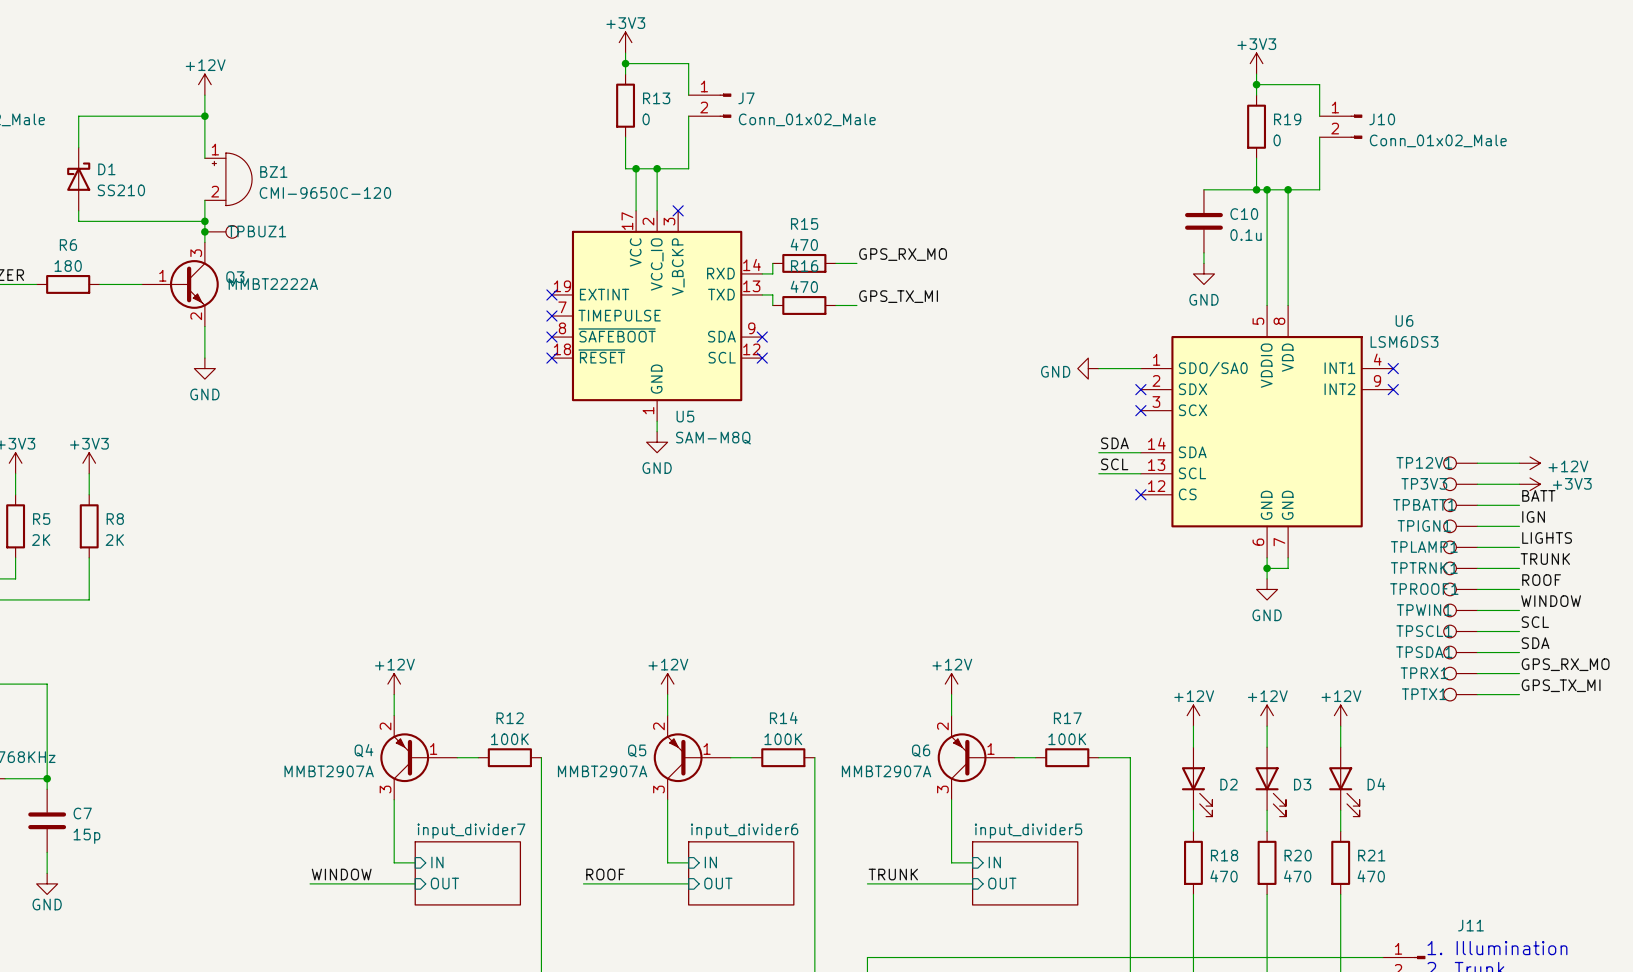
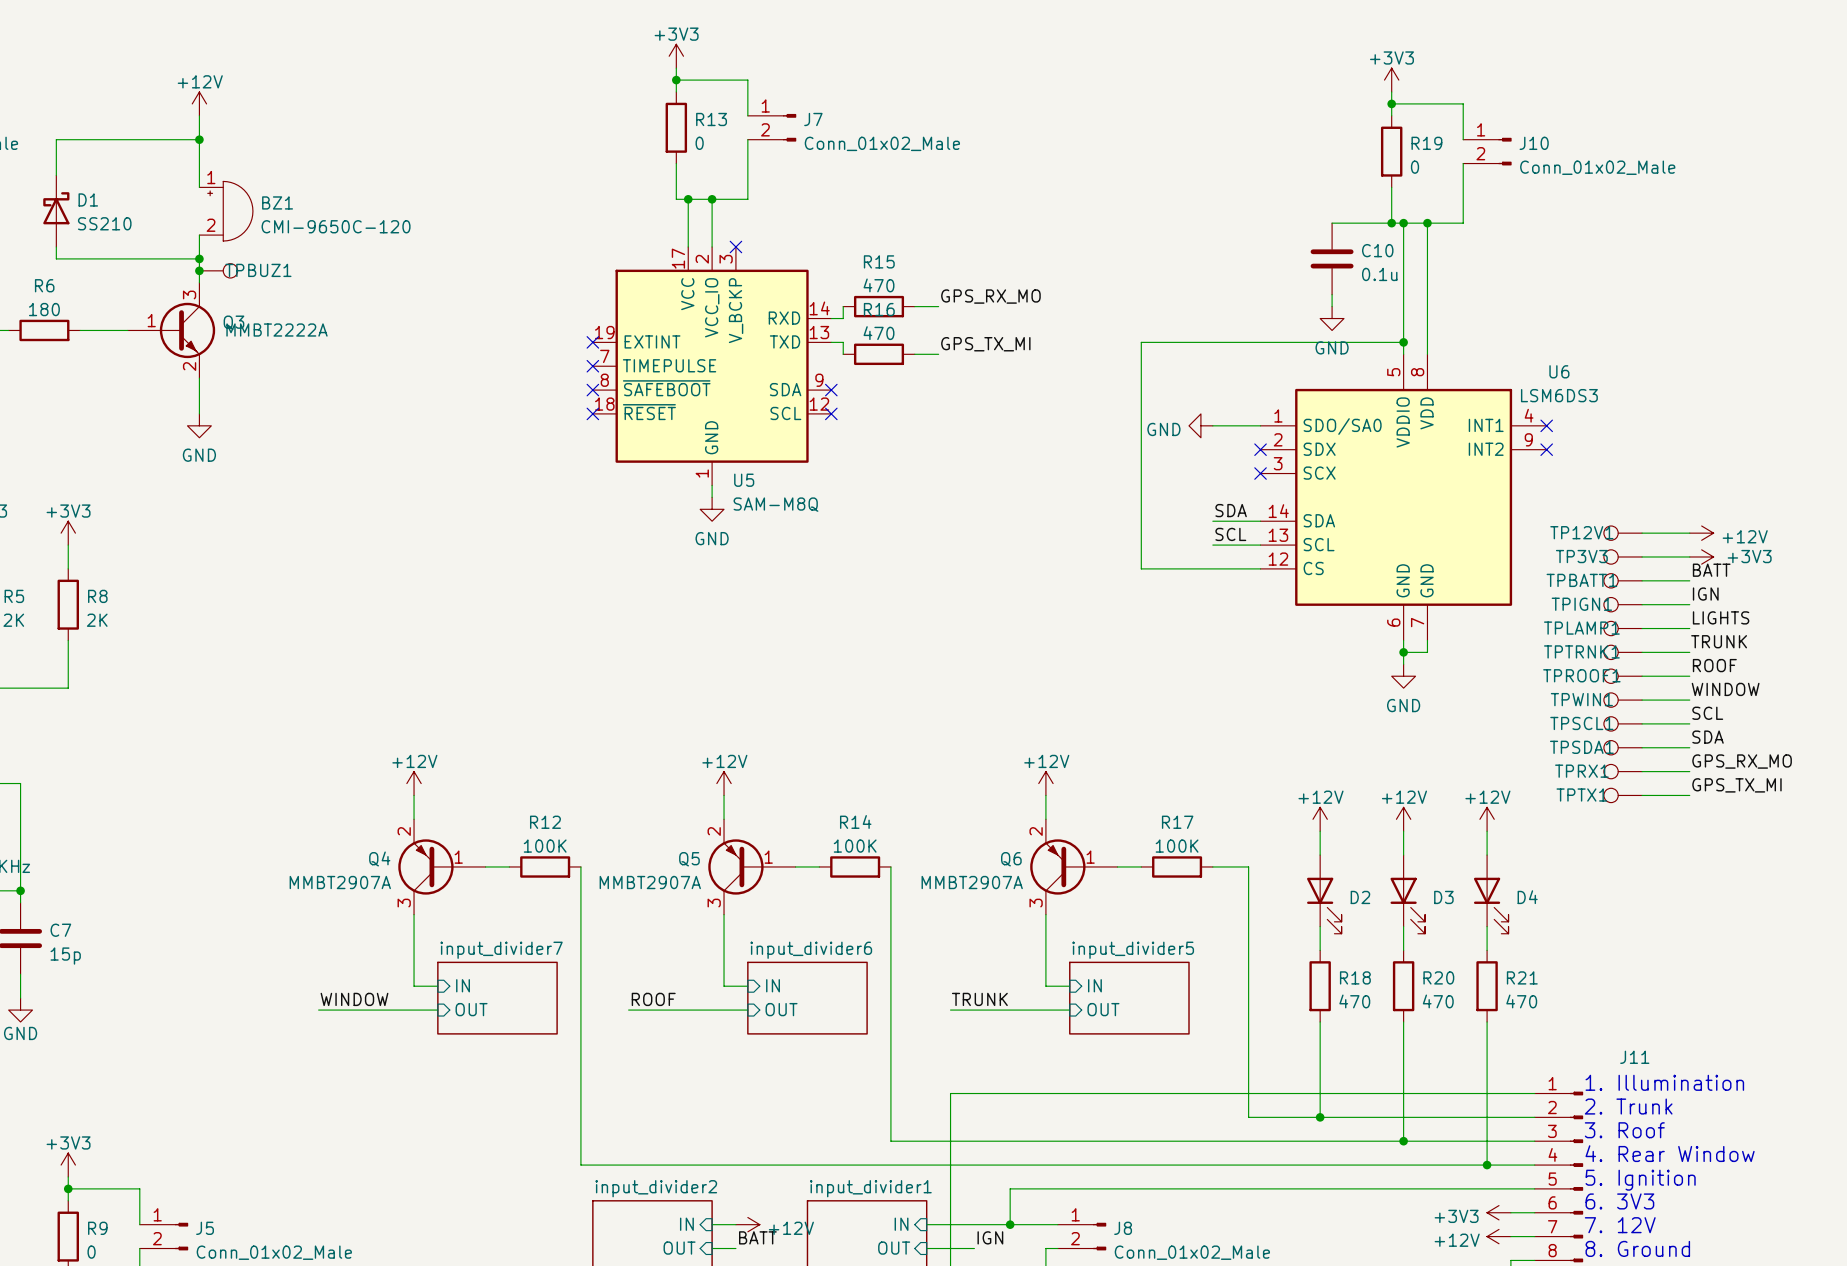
wire: none -> (1403, 342) (1141, 342) (1141, 568) (1260, 568)
junction: none -> (1403, 342)
no-connect mark: (1140, 494) -> none

